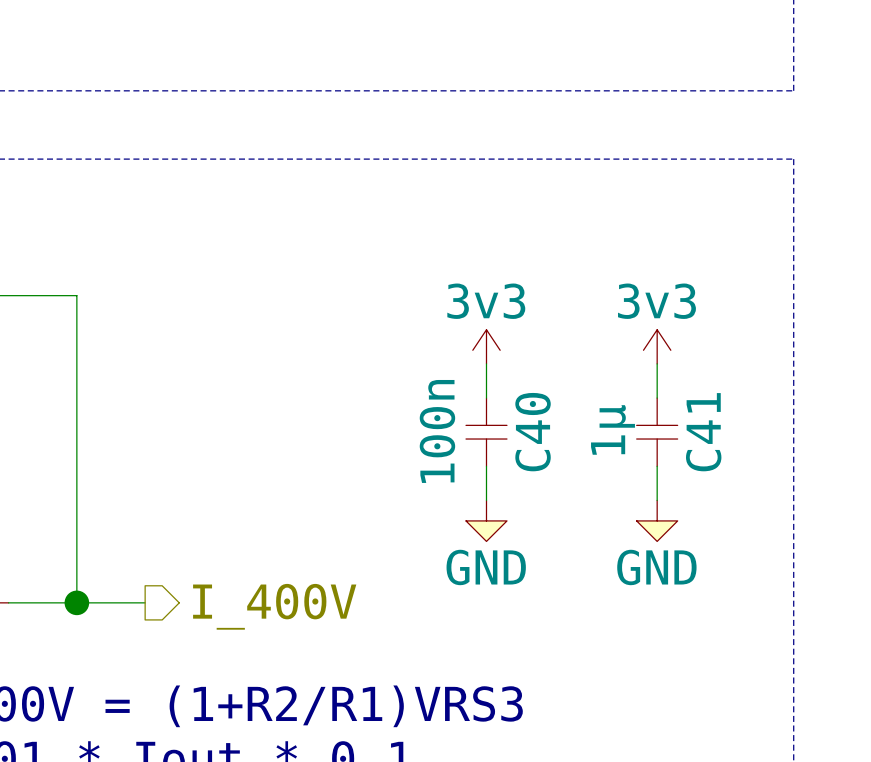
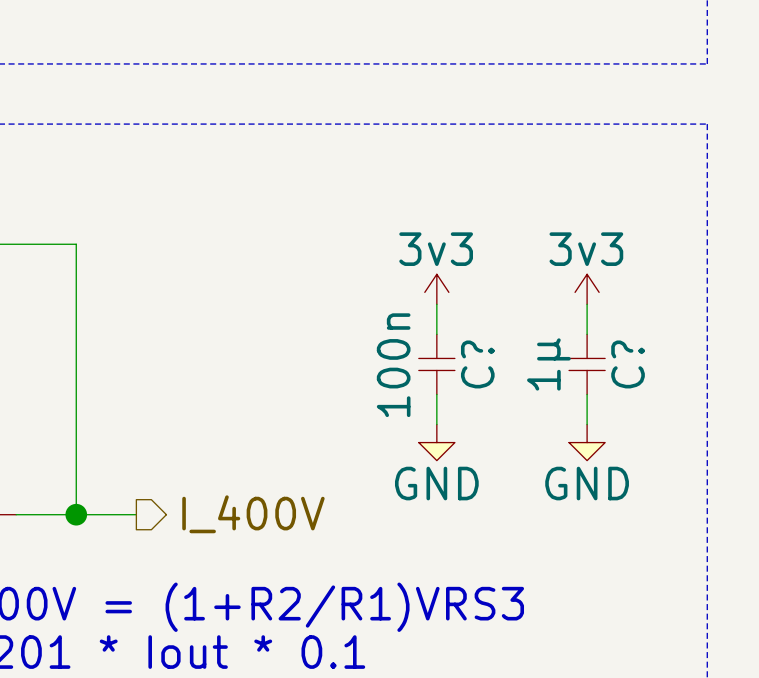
C40 name: C40 (533, 432) -> C? (477, 364)
C41 name: C41 (703, 432) -> C? (628, 364)

